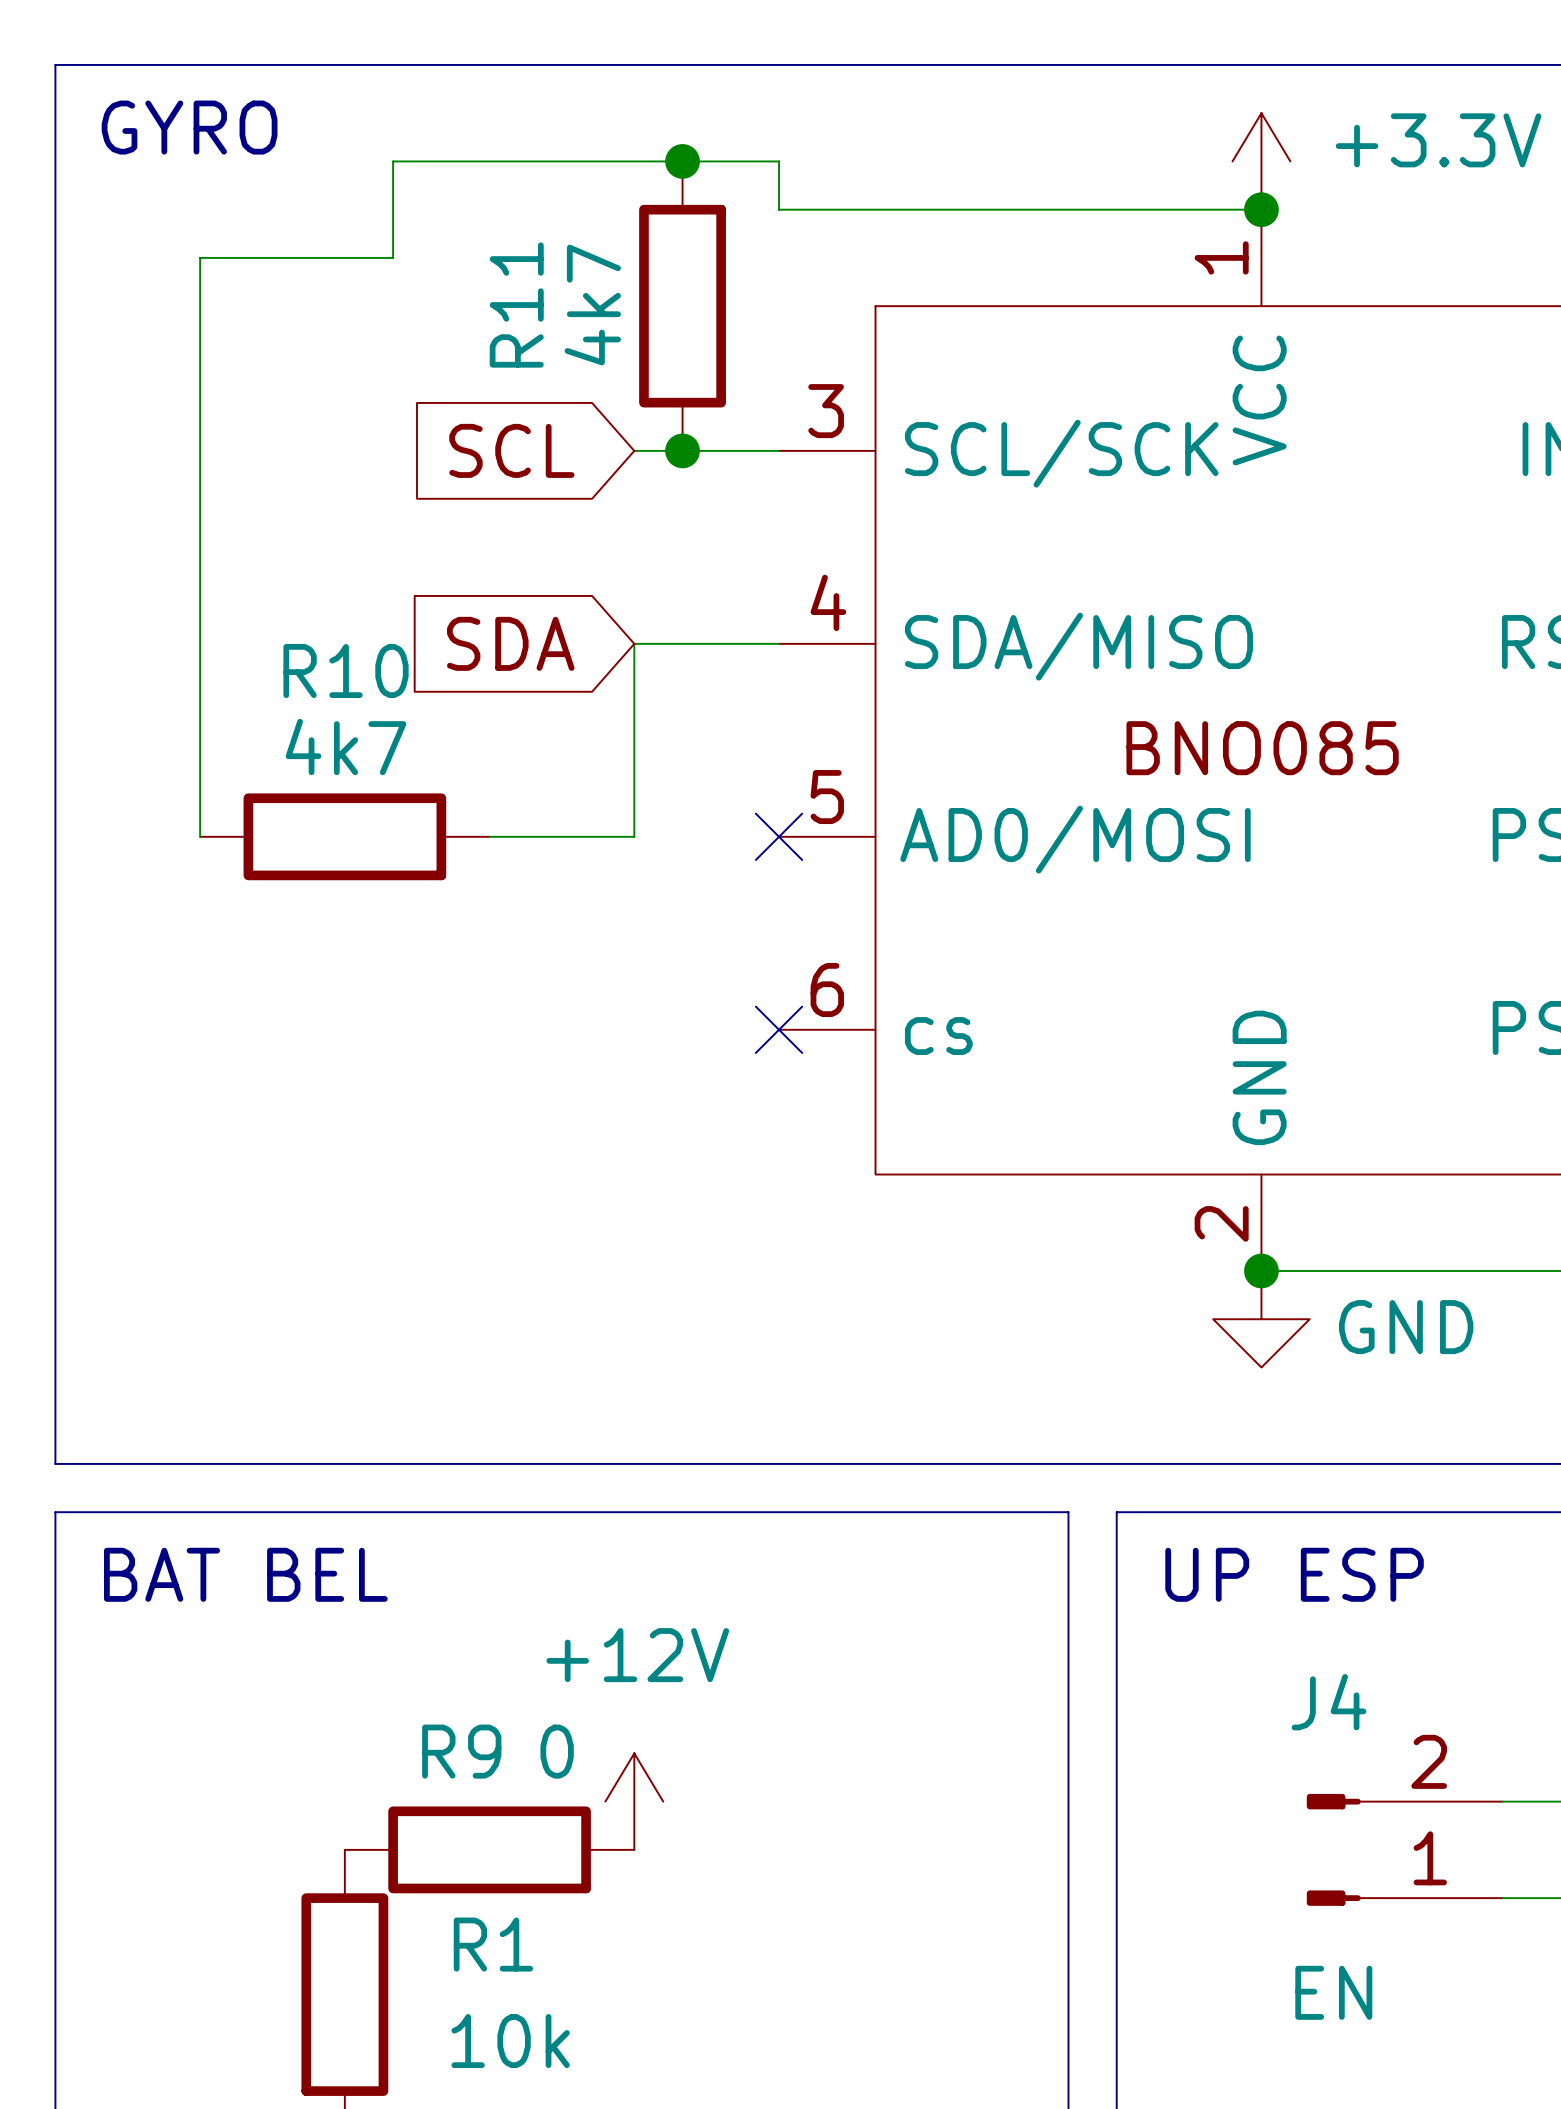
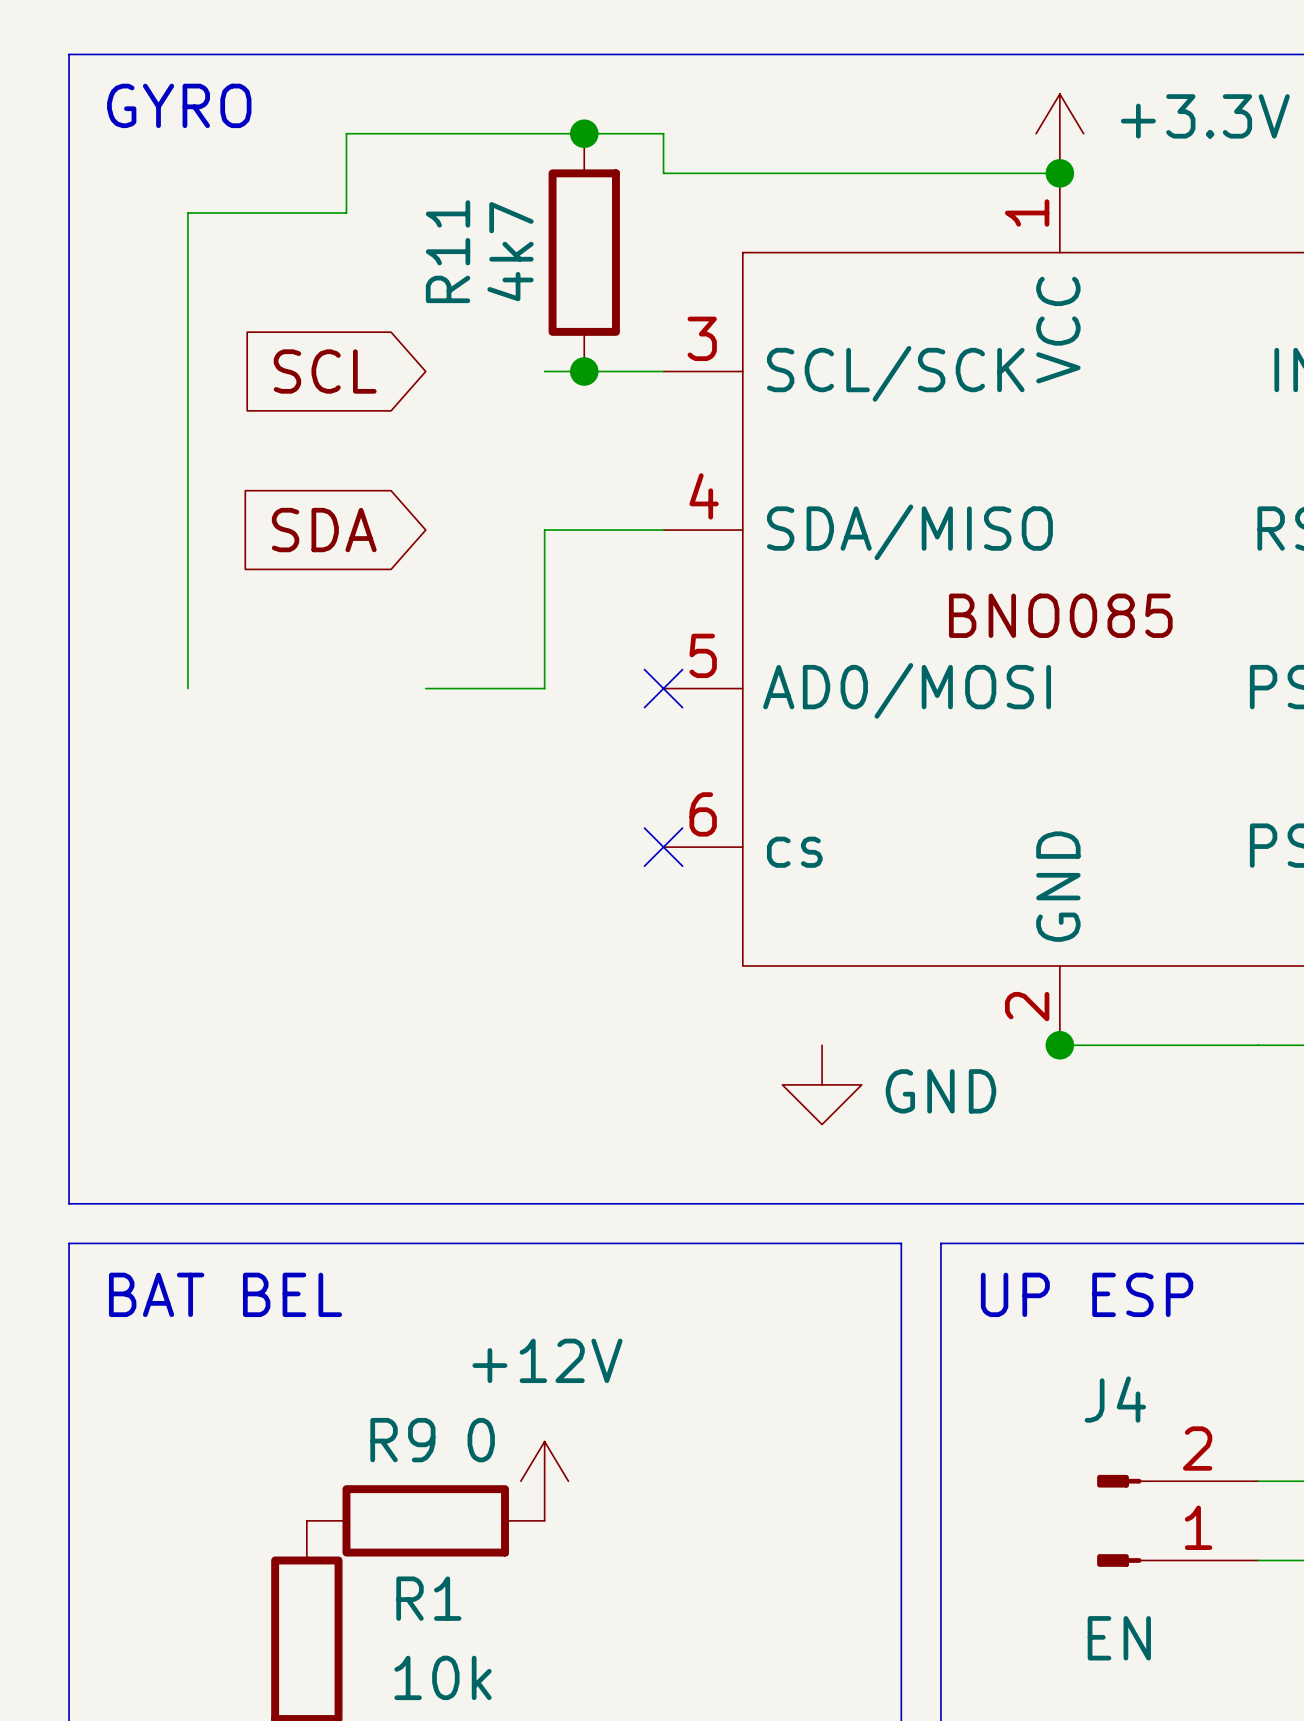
global label position: SCL (511, 450) -> SCL (325, 371)
global label position: SDA (510, 643) -> SDA (324, 530)
R10: 4k7 (344, 836) -> none
power symbol position: GND (1261, 1319) -> GND (822, 1084)

